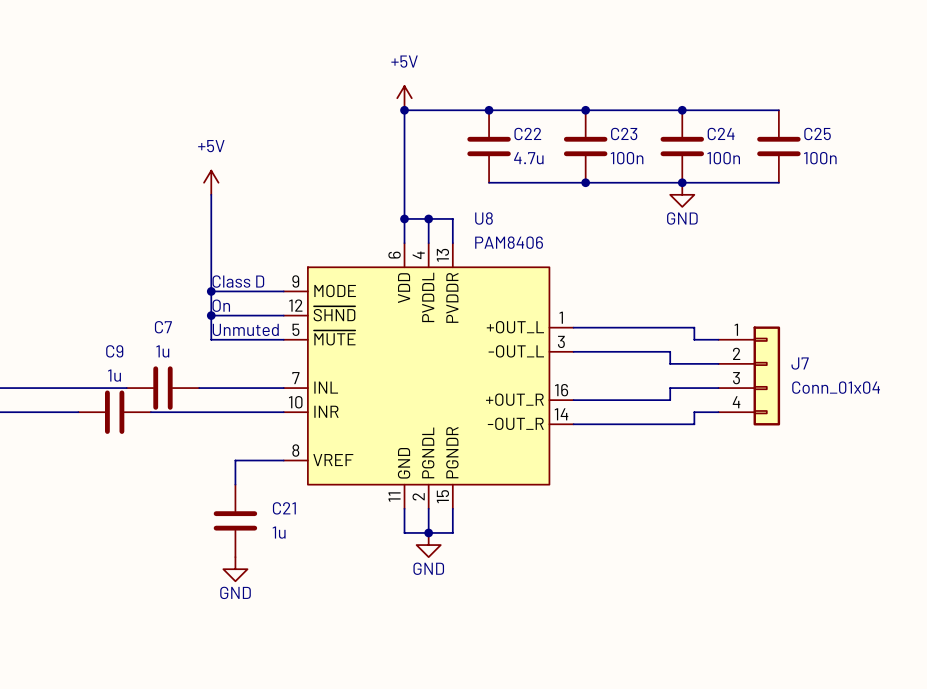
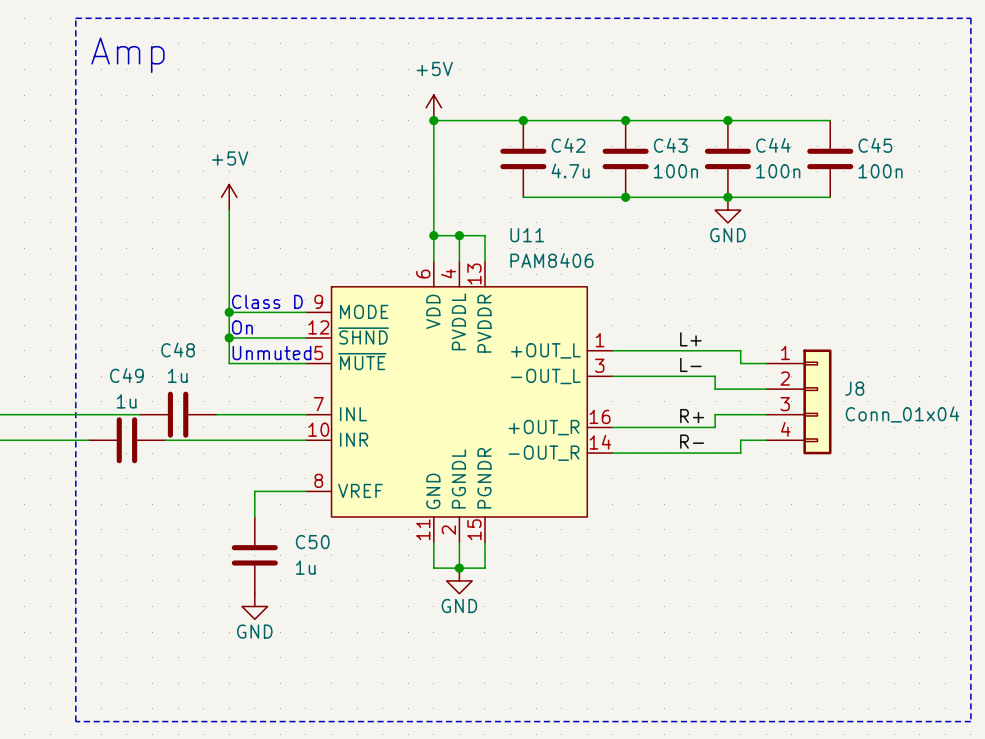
line: none -> (75, 18) (970, 18) (970, 721) (75, 721) (75, 18)
text: none -> Amp (127, 55)
C22 name: C22 (527, 133) -> C42 (568, 145)
C23 name: C23 (624, 133) -> C43 (670, 145)
C24 name: C24 (721, 133) -> C44 (773, 145)
C25 name: C25 (817, 133) -> C45 (875, 145)
U8 name: U8 (483, 218) -> U11 (527, 235)
label: none -> L+ (690, 339)
C7 name: C7 (163, 327) -> C48 (178, 349)
label: none -> L- (690, 364)
C9 name: C9 (114, 351) -> C49 (126, 375)
J7 name: J7 (800, 363) -> J8 (854, 388)
label: none -> R+ (692, 416)
label: none -> R- (692, 441)
C21 name: C21 (284, 508) -> C50 (312, 542)

